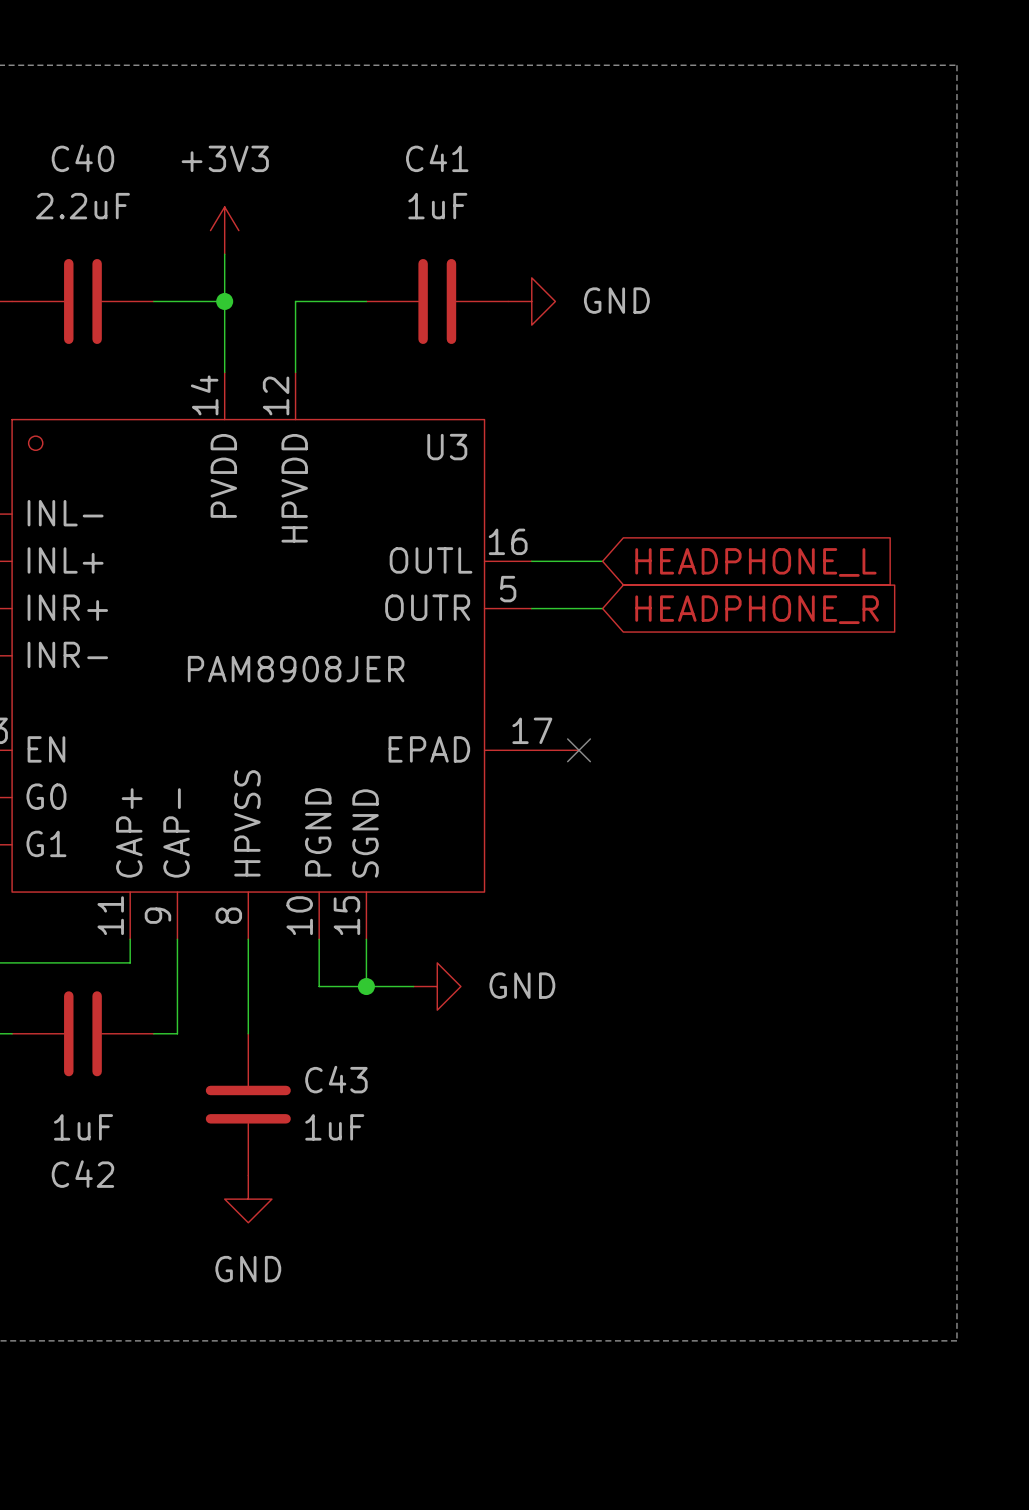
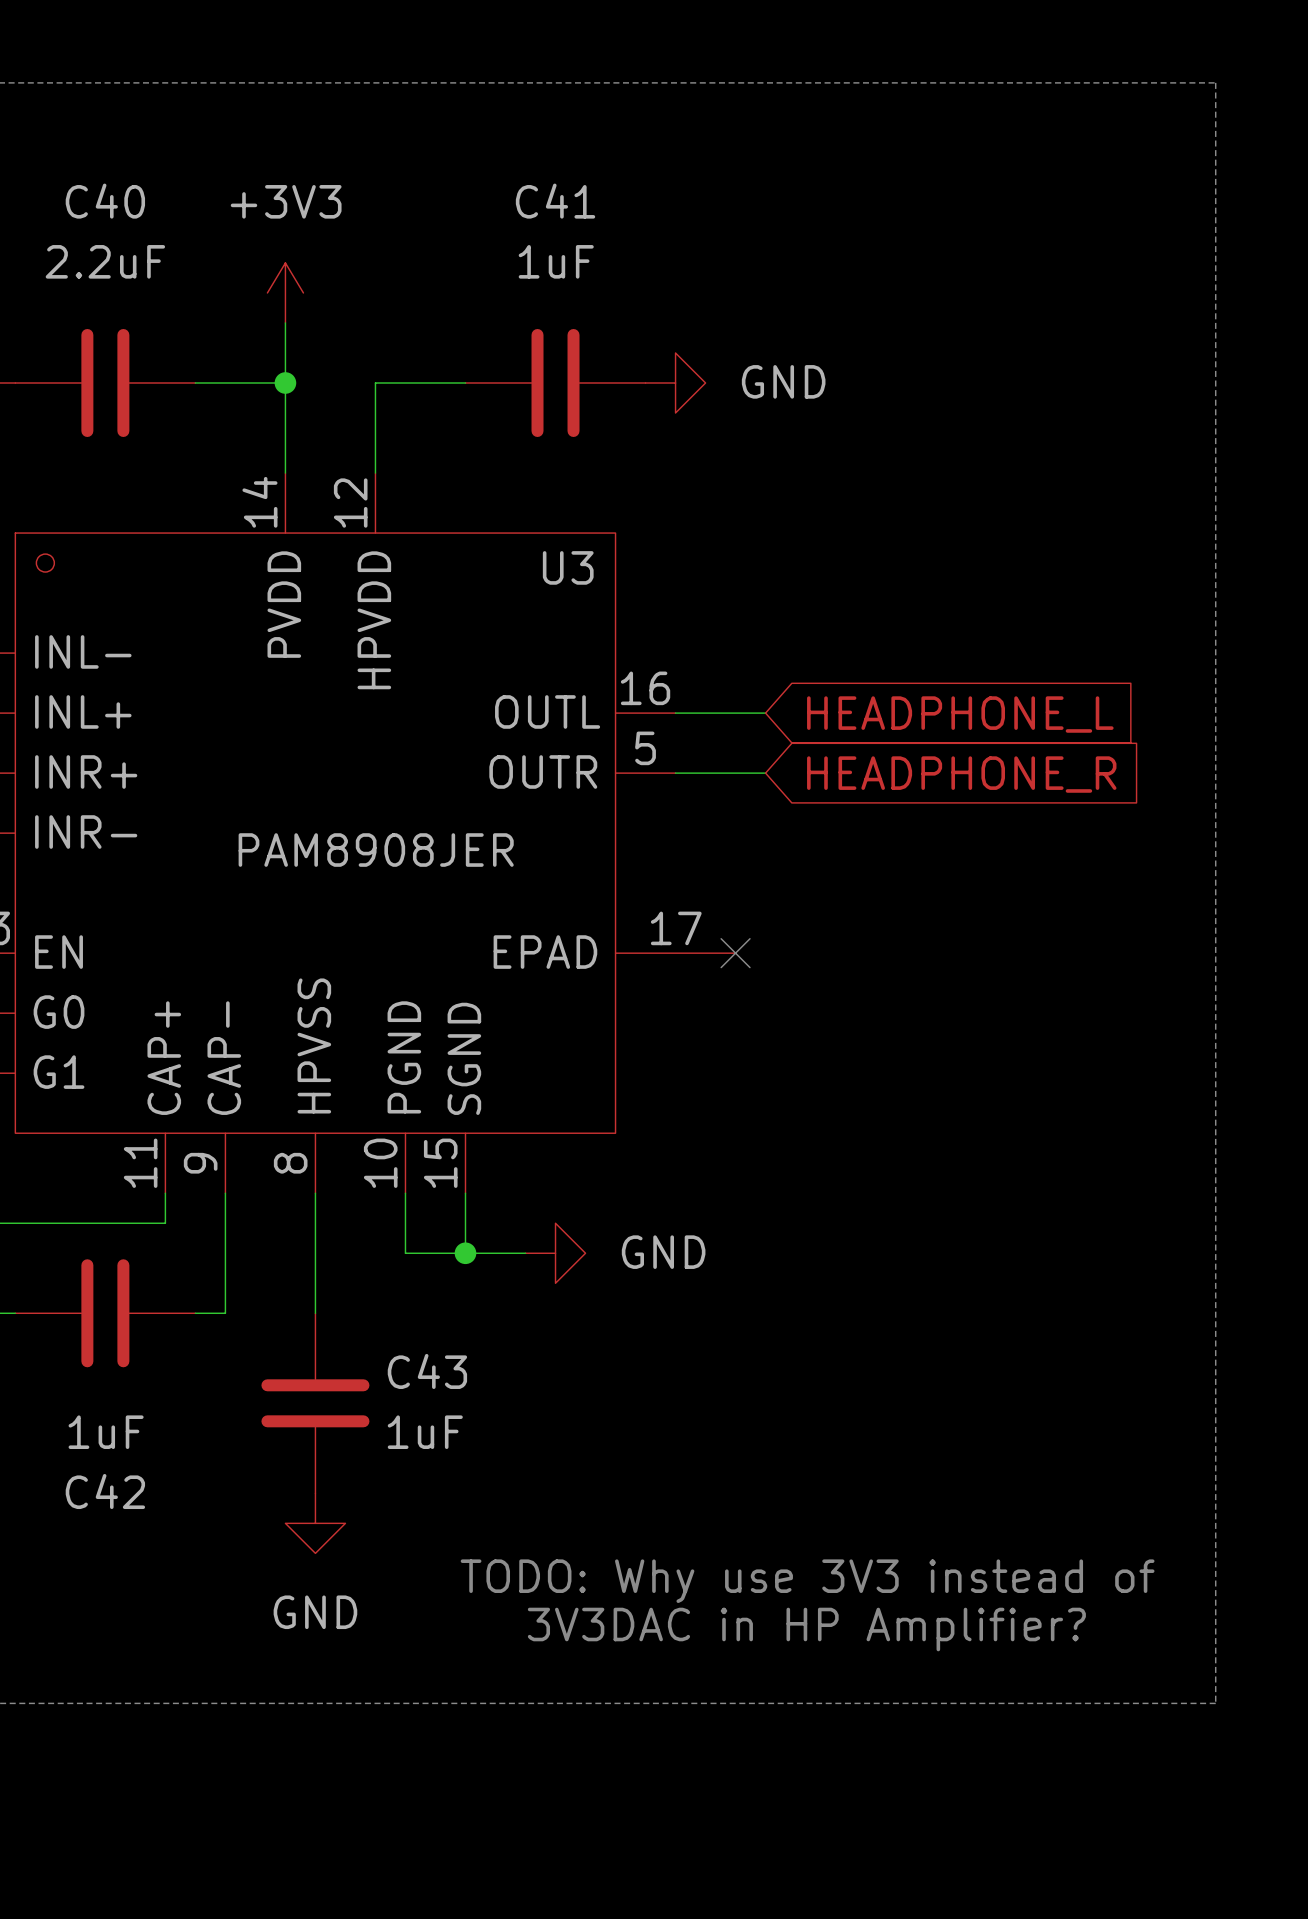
text: none -> TODO: Why use 3V3 instead of (807, 1581)
text: none -> 3V3DAC in HP Amplifier? (806, 1629)

